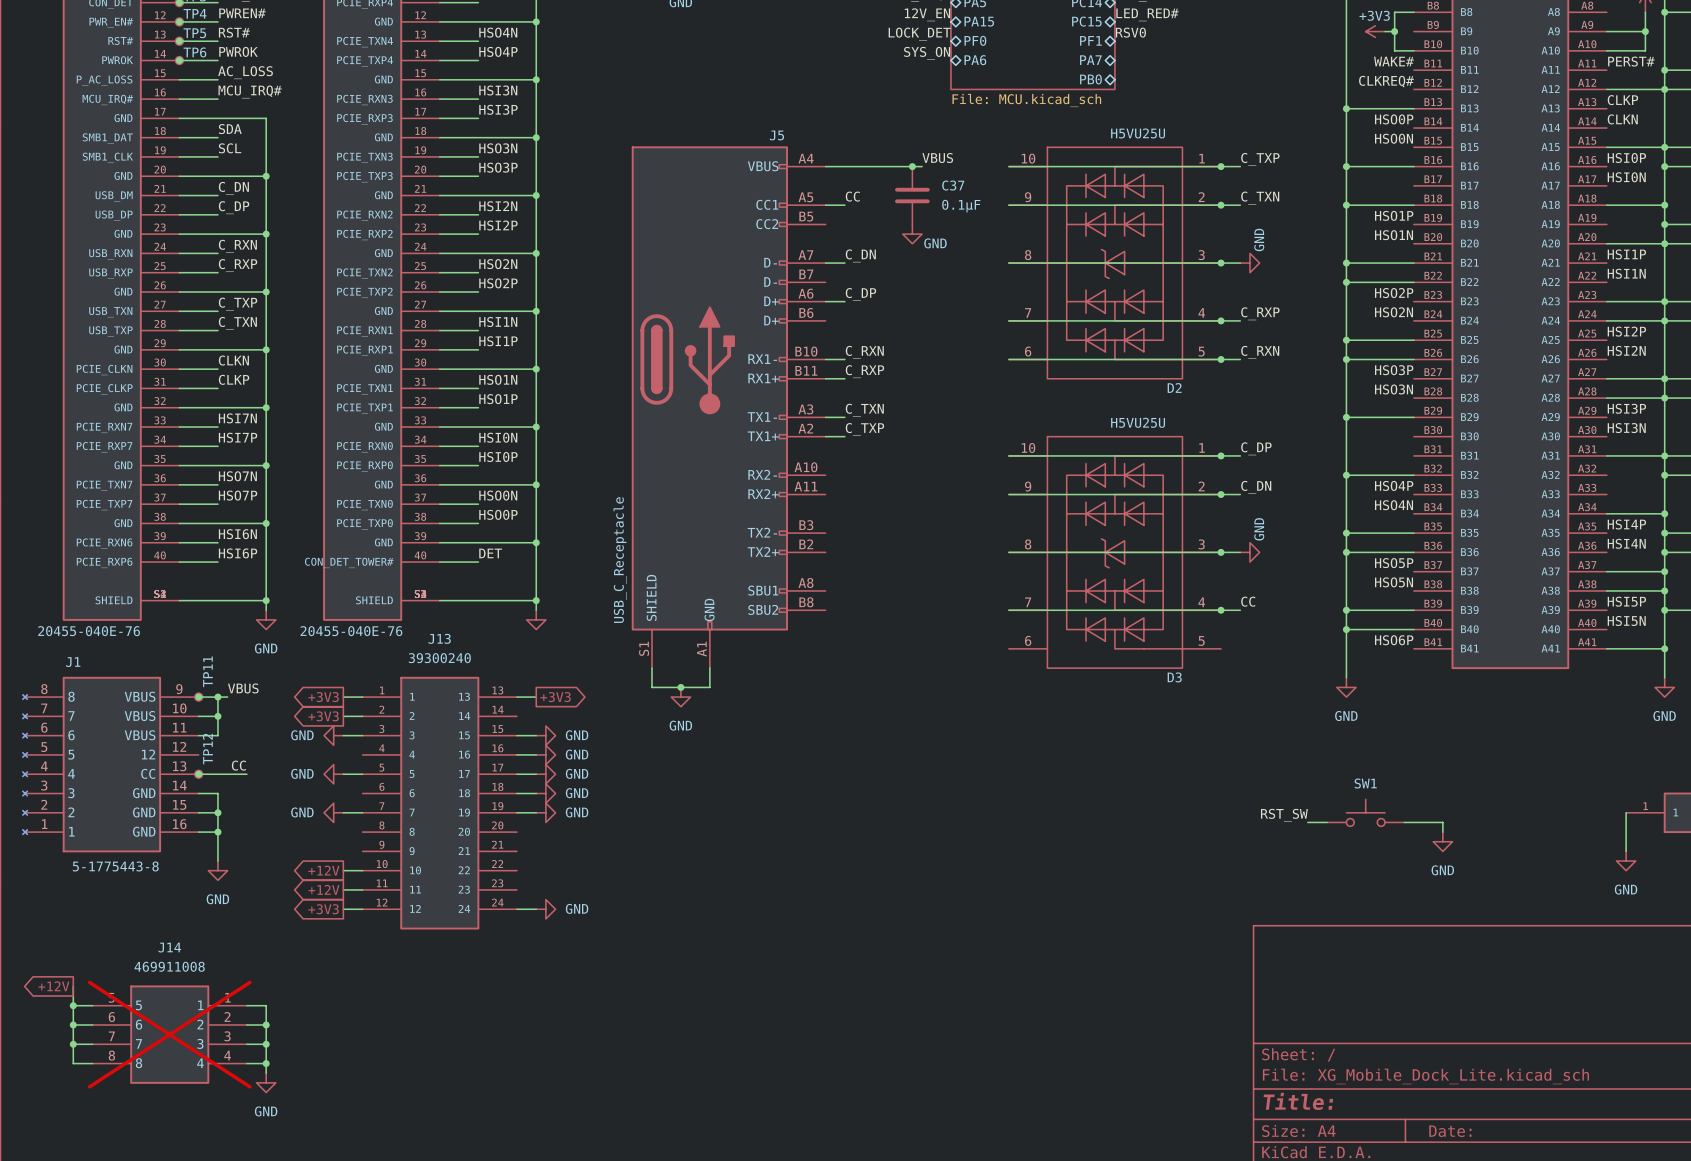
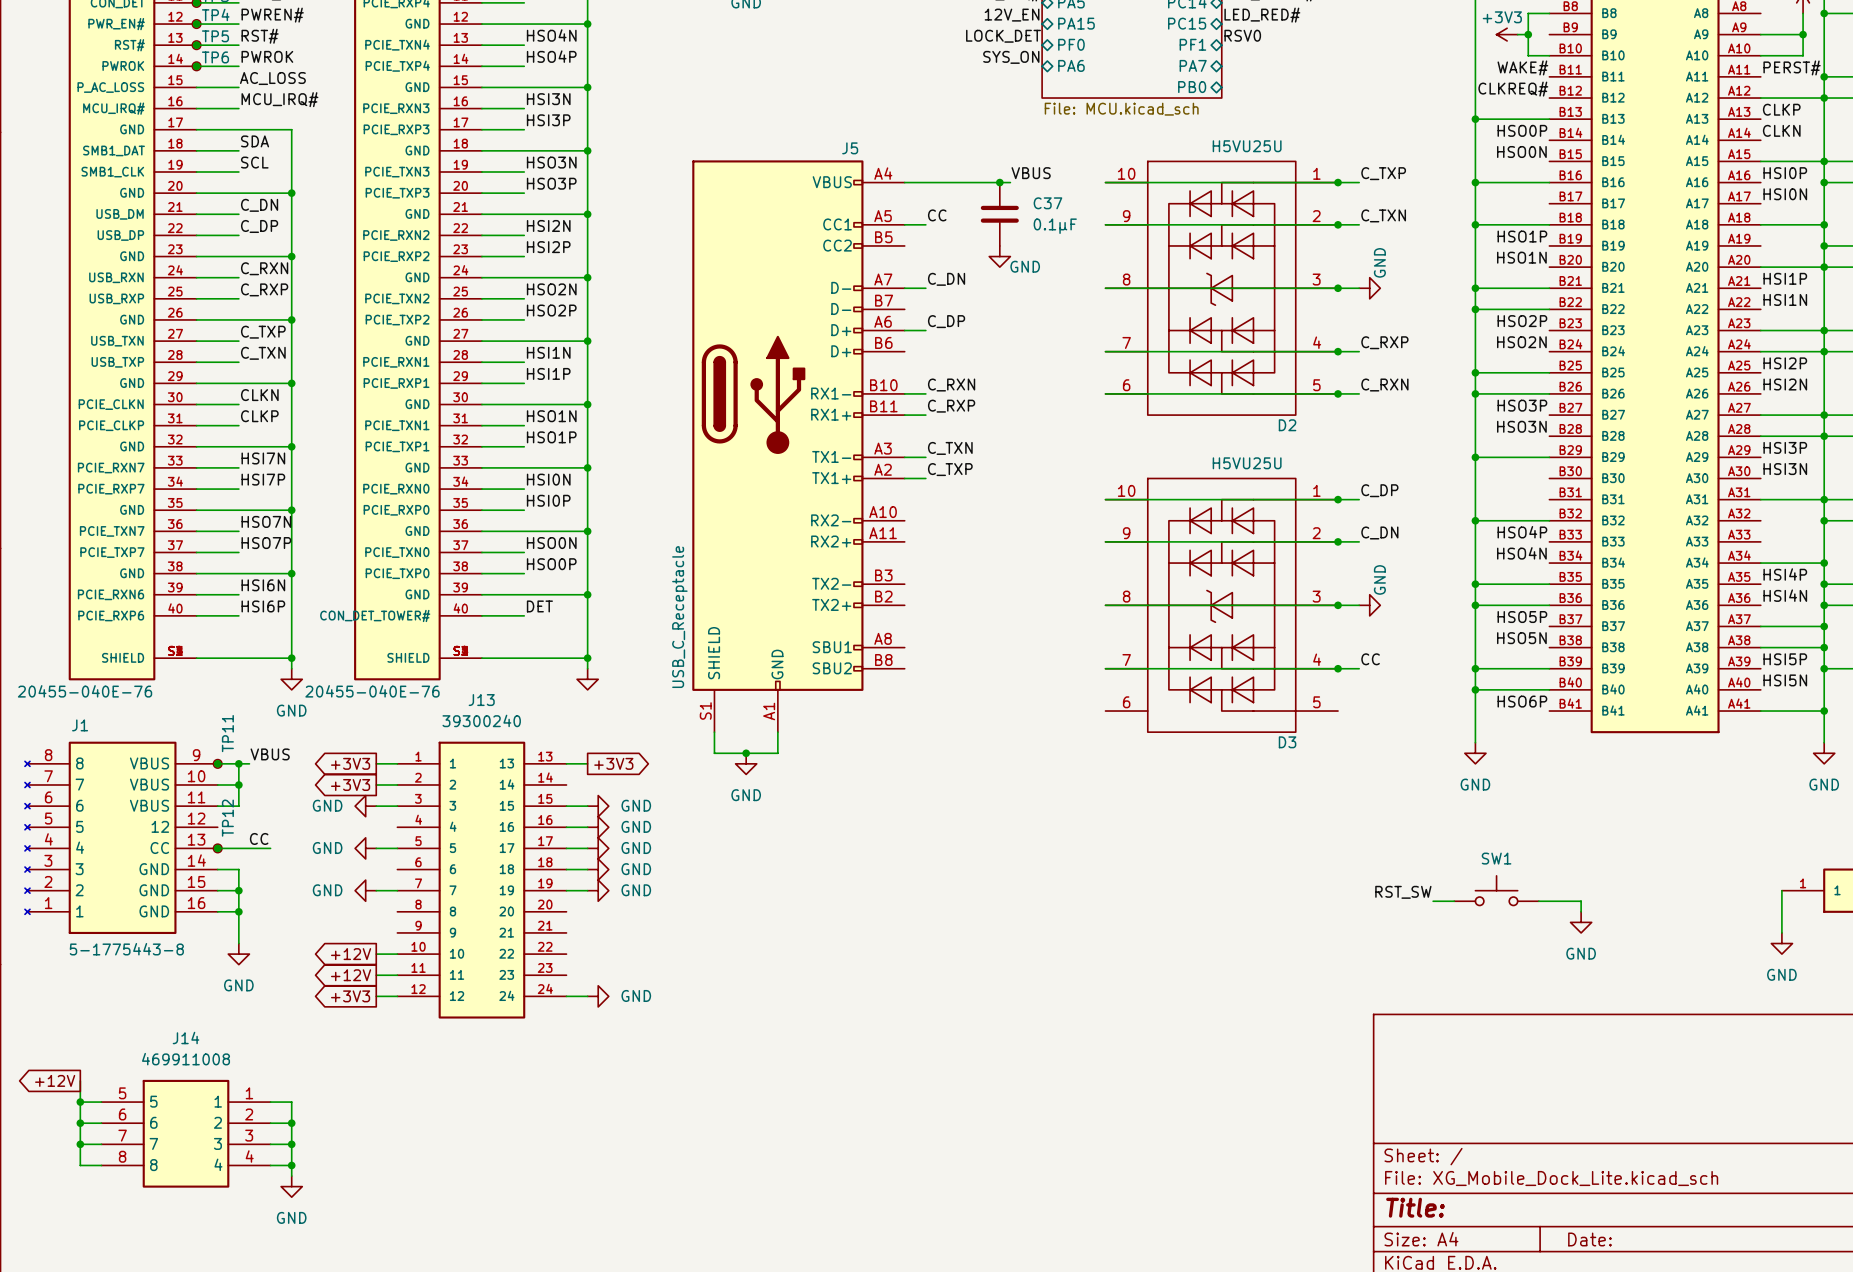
J14 do-not-place cross: (169, 1034) -> none

